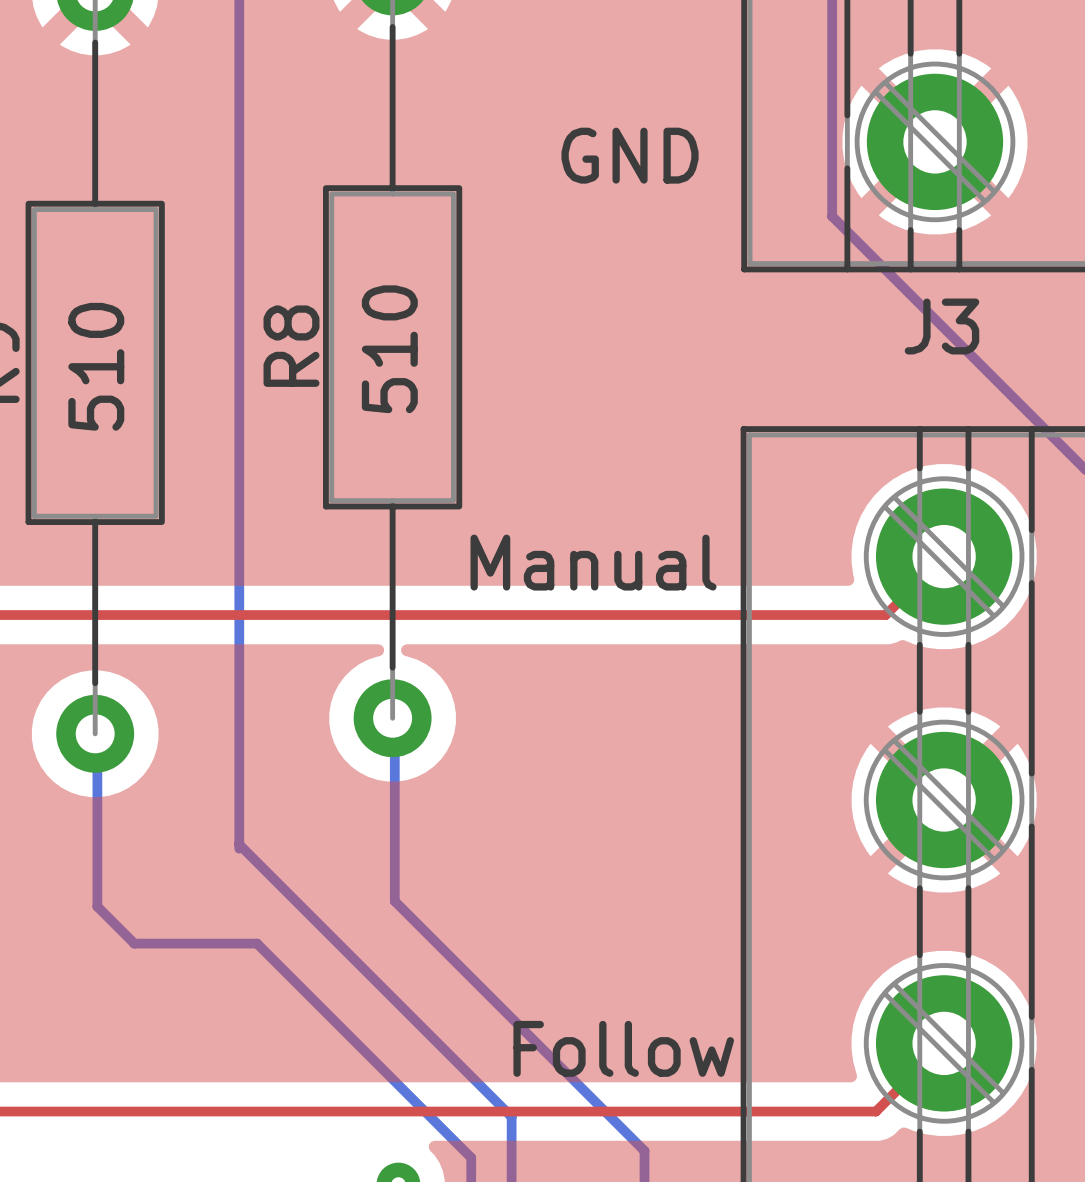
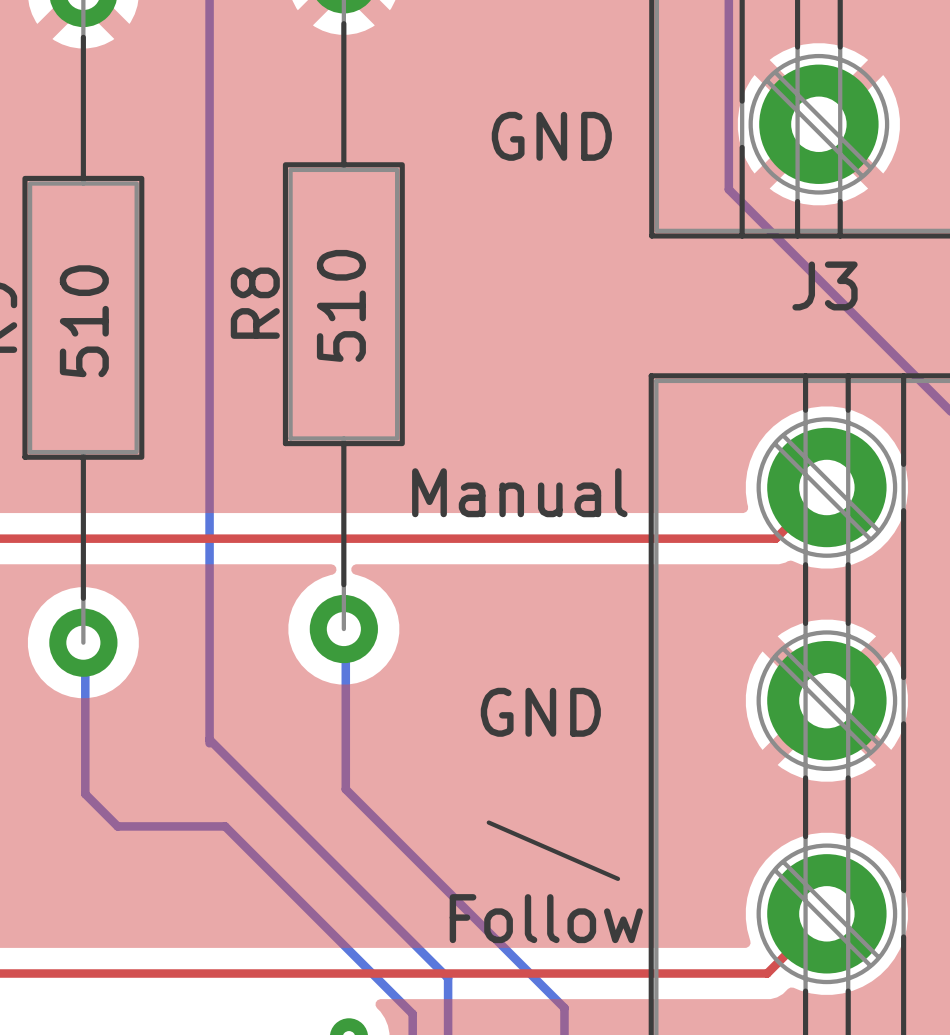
text: none -> GND (540, 712)
line: none -> (488, 822) (617, 878)

